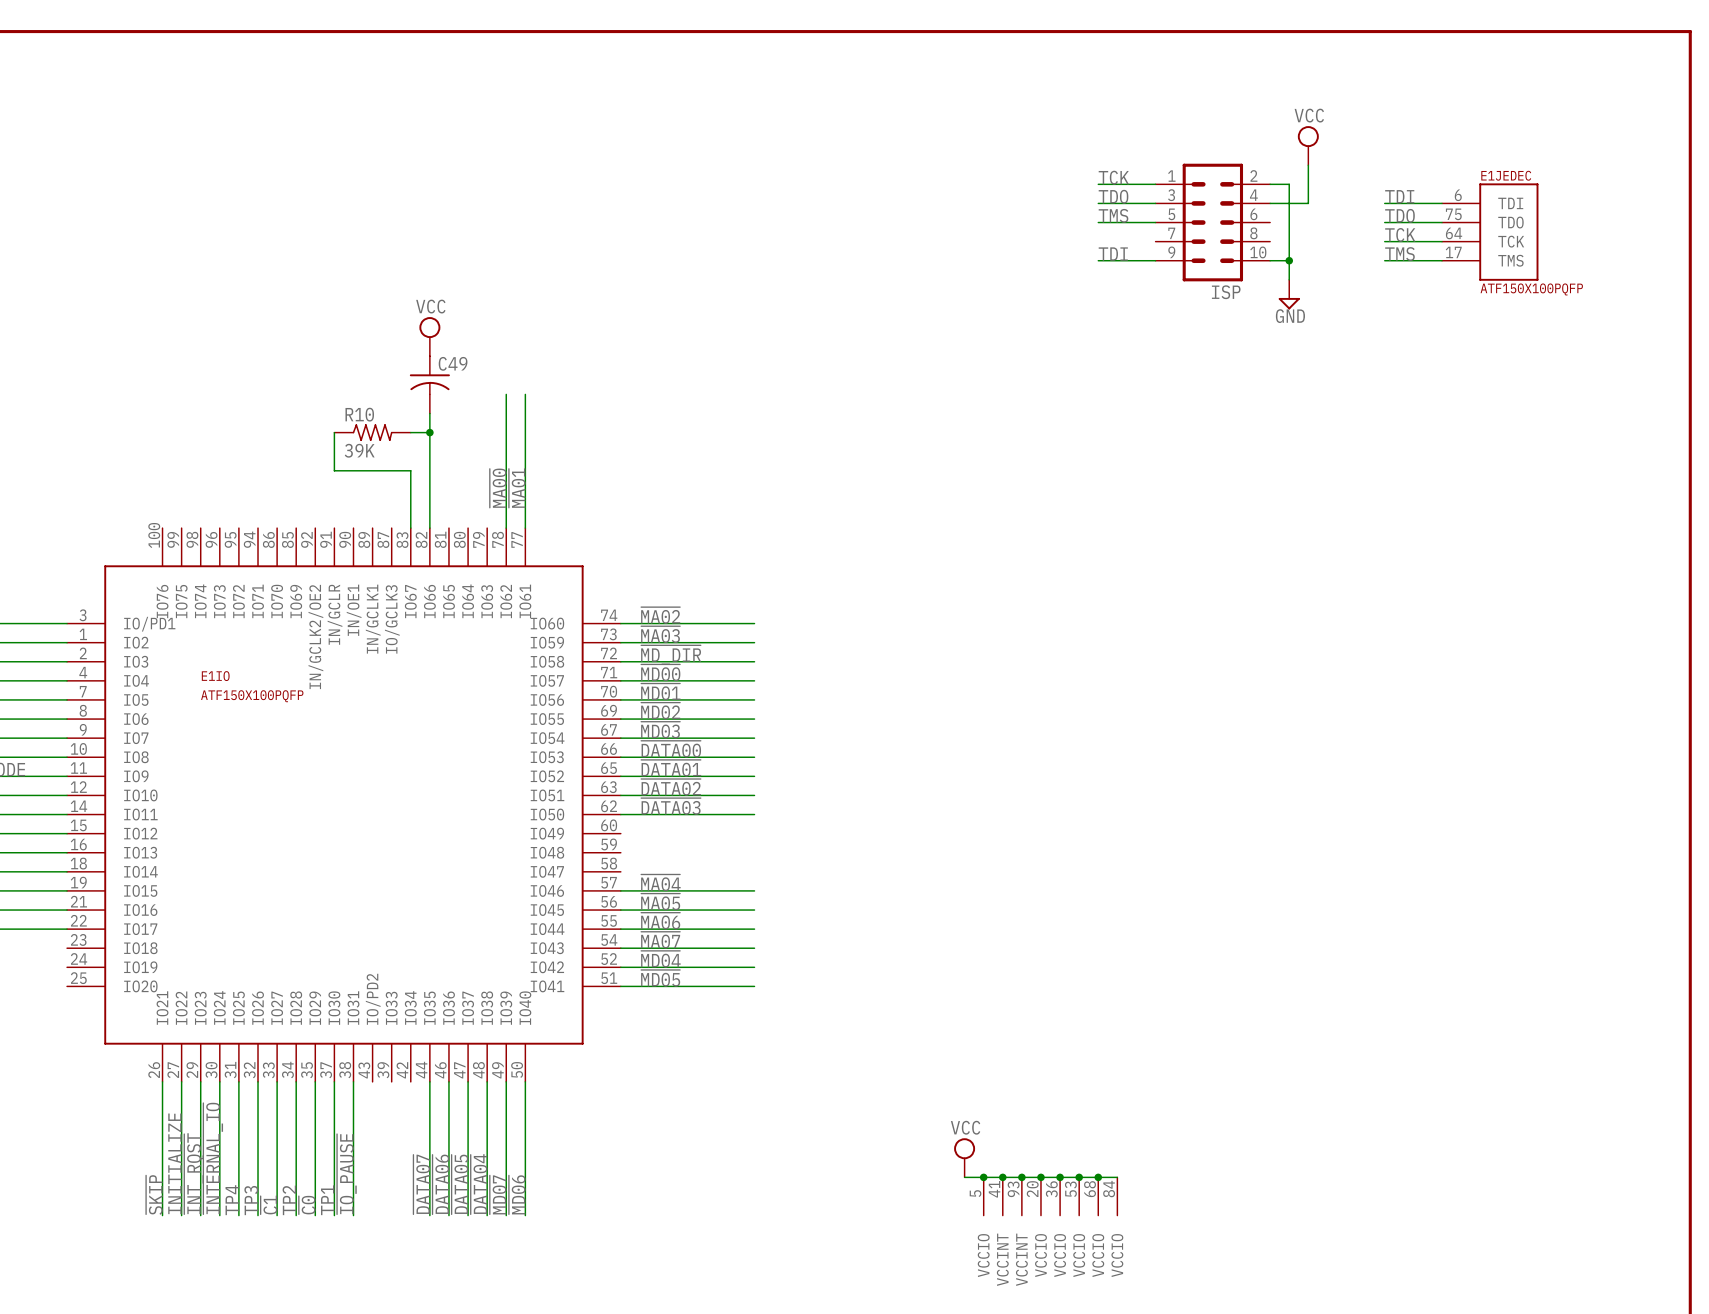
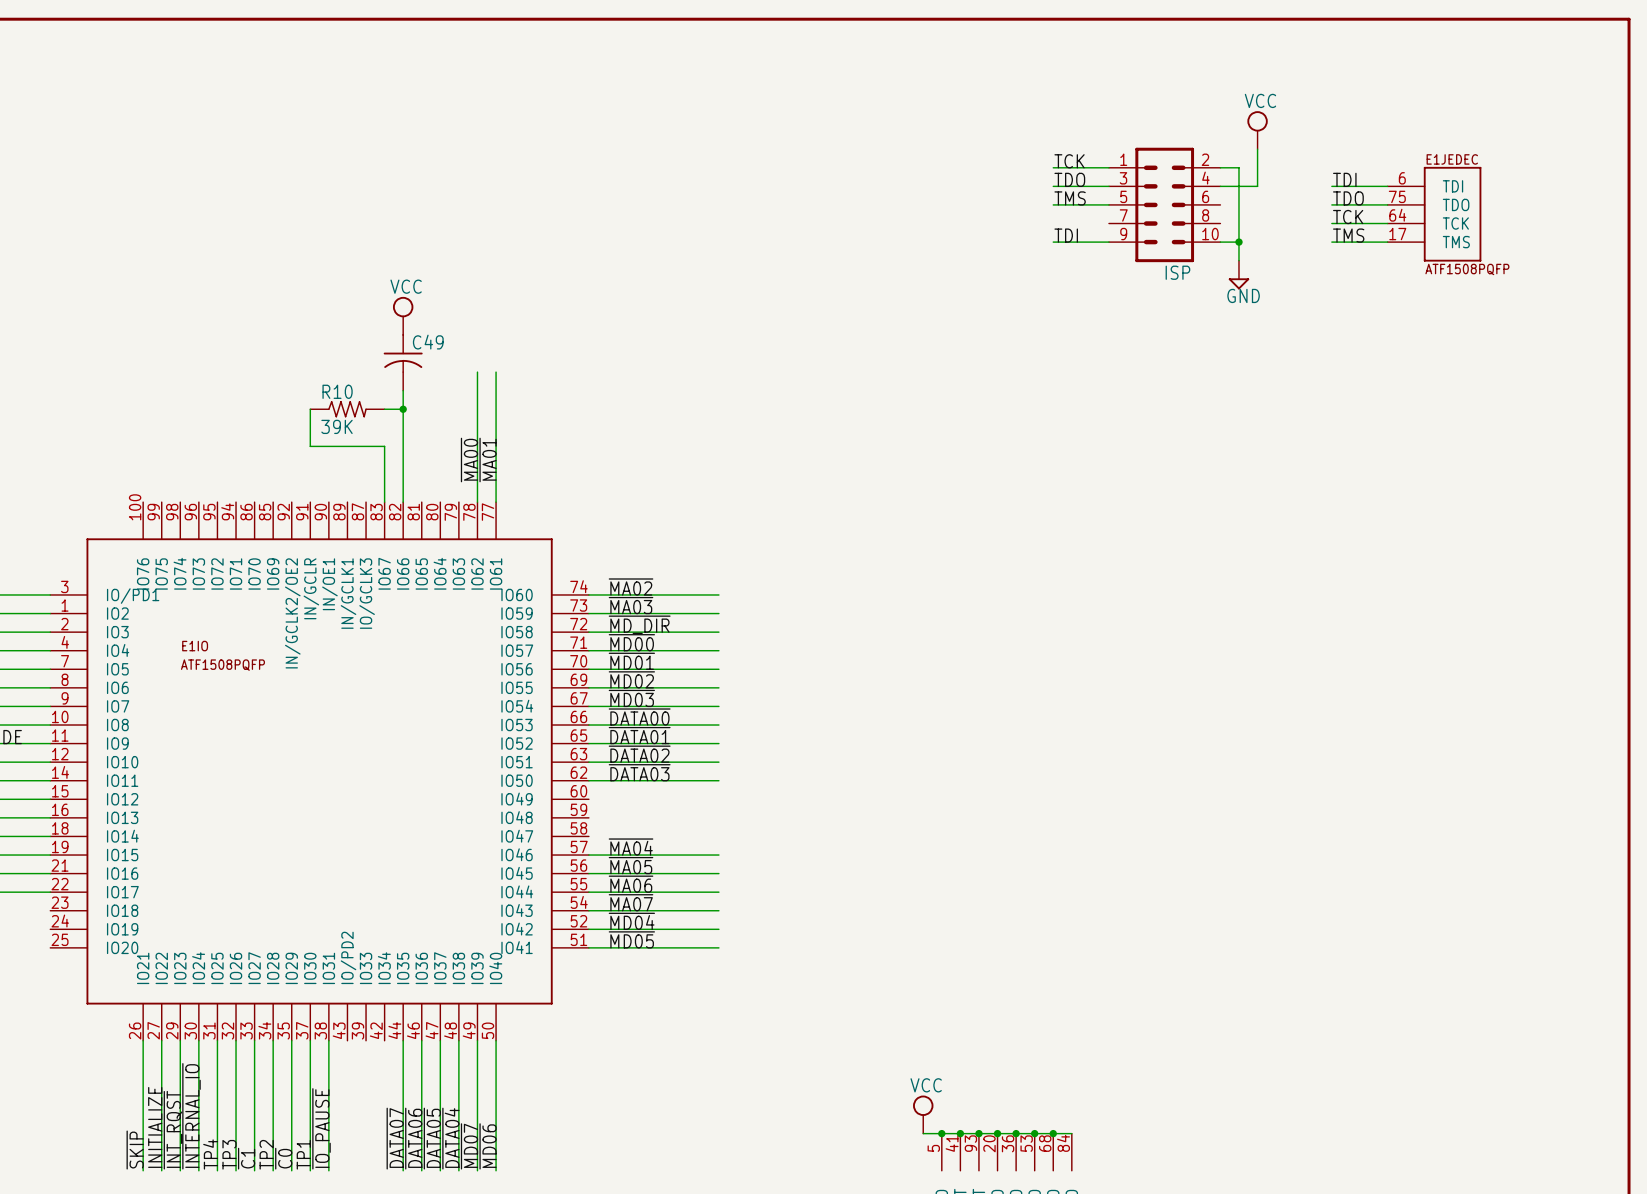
E1JEDEC value: ATF150X100PQFP (1531, 289) -> ATF1508PQFP (1467, 269)
E1IO value: ATF150X100PQFP (252, 696) -> ATF1508PQFP (222, 665)

